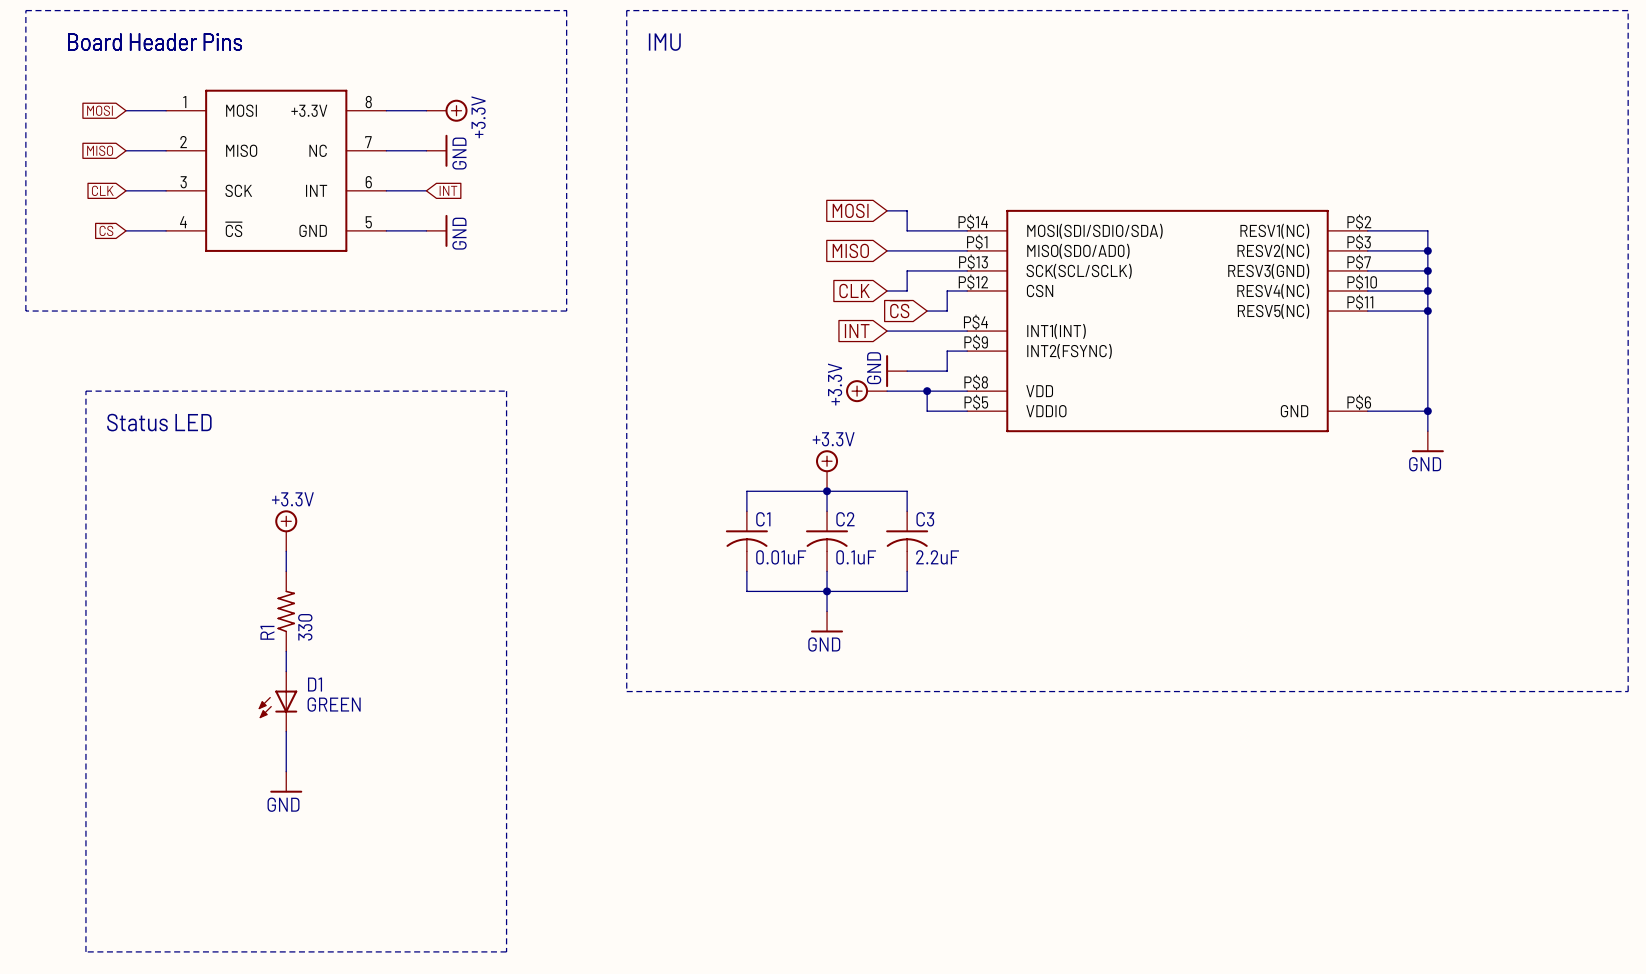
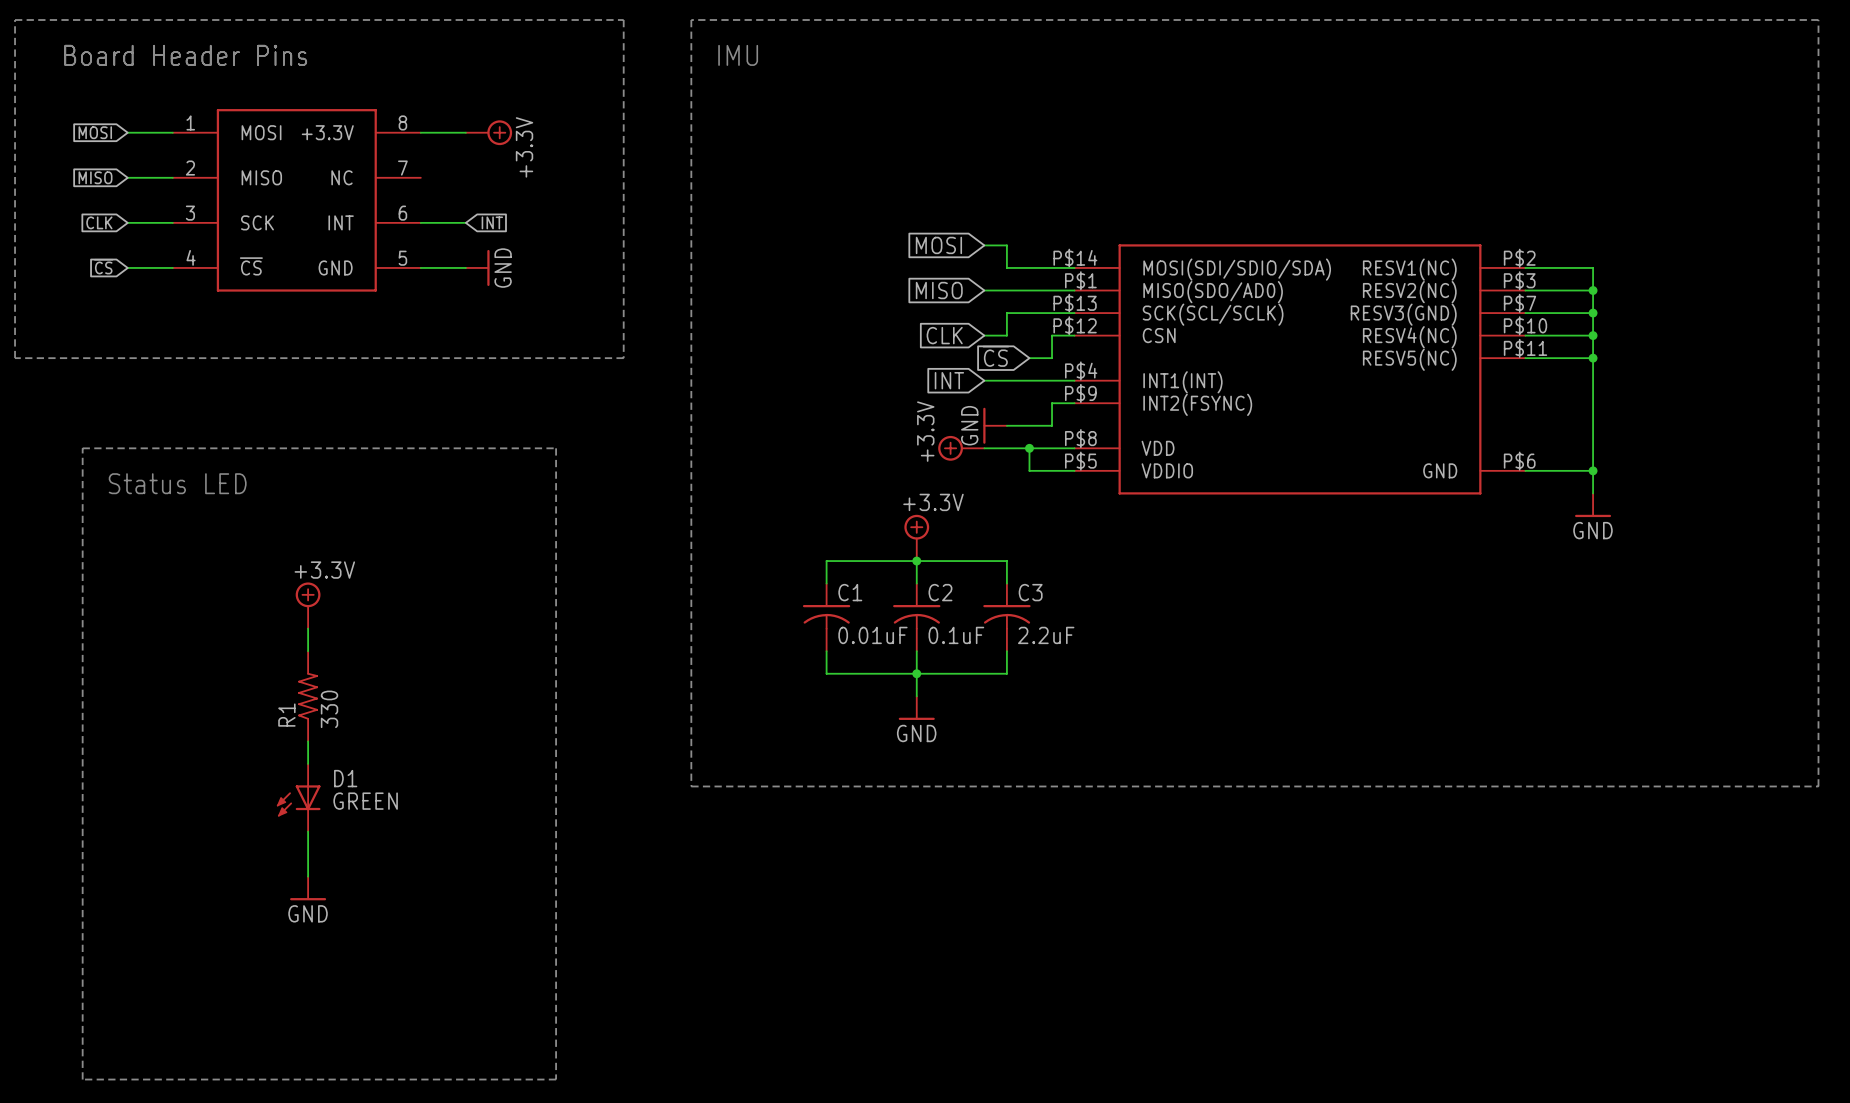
wire: (386, 150) (426, 150) -> none
power symbol: GND (436, 150) -> none

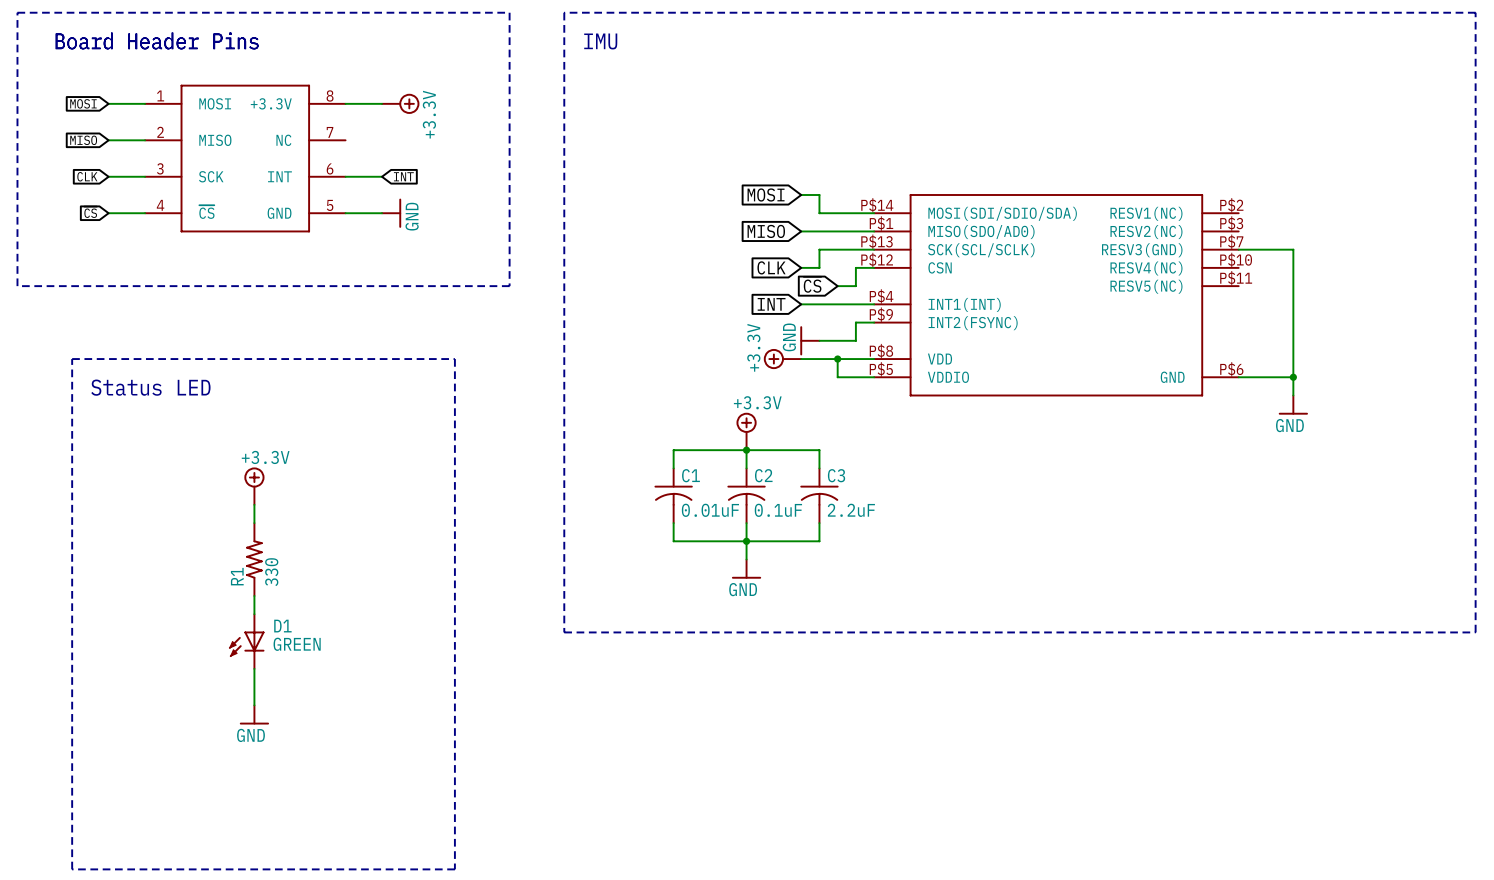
wire: (1525, 267) (1593, 267) (1593, 313) -> none
wire: (1525, 290) (1593, 290) -> none
junction: (1593, 290) -> none
junction: (1593, 313) -> none
wire: (1525, 335) (1593, 335) -> none
junction: (1593, 335) -> none
wire: (1525, 358) (1593, 358) -> none
junction: (1593, 358) -> none

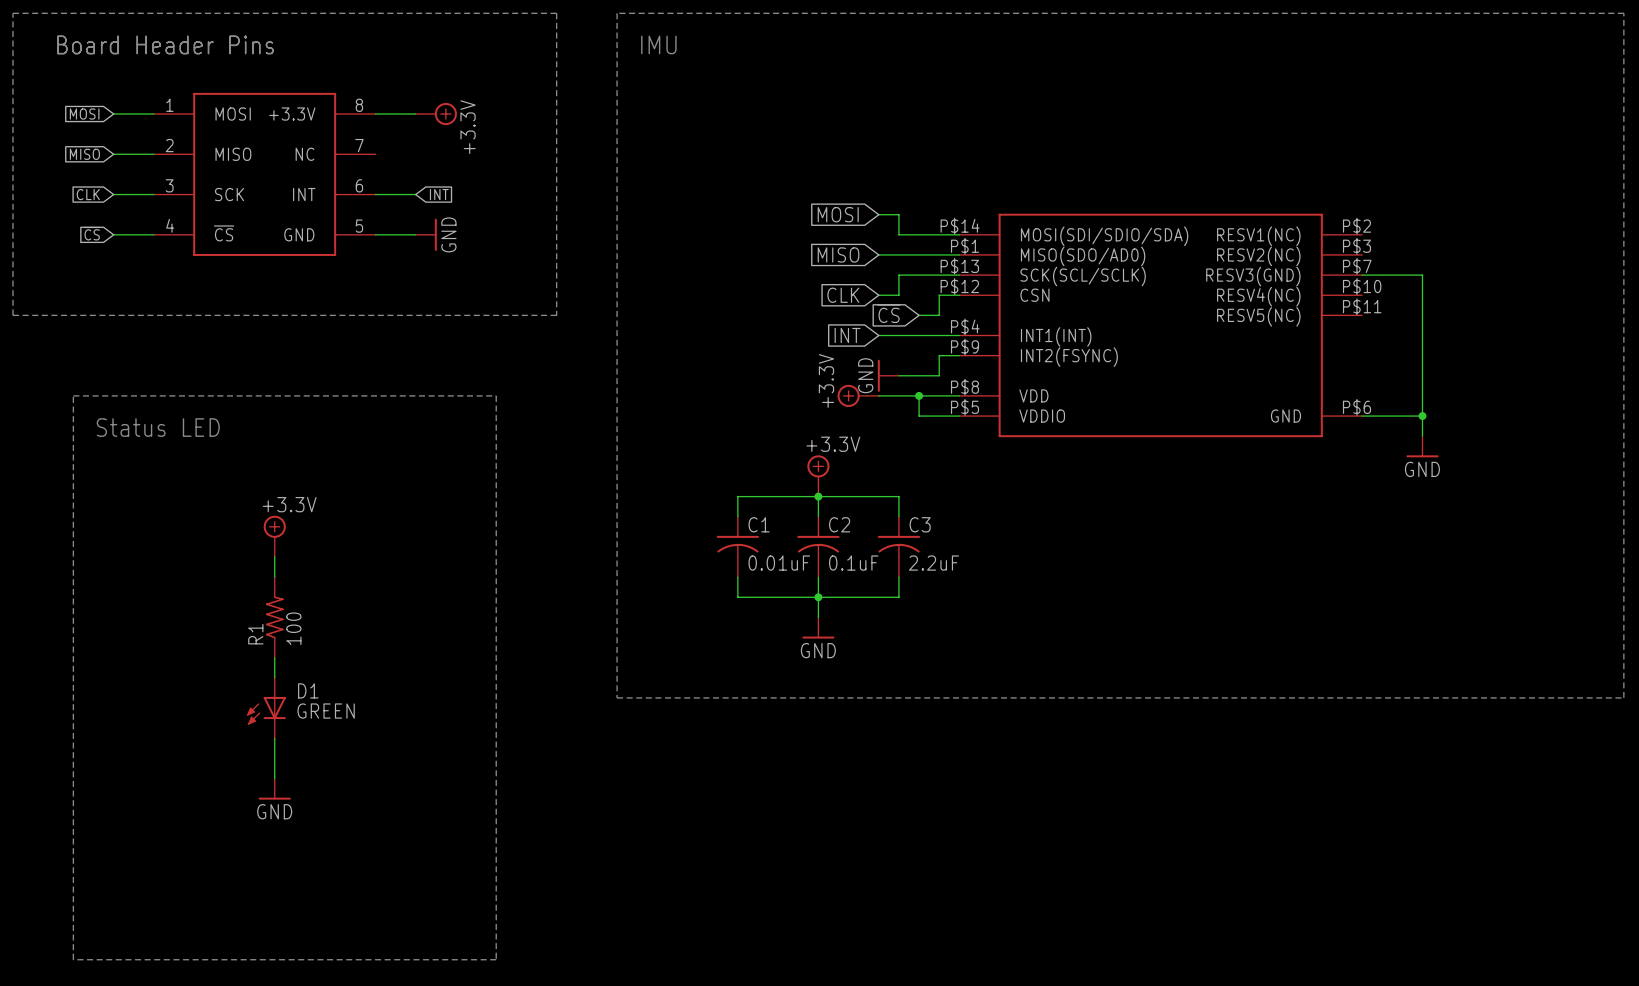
R1 value: 330 (271, 572) -> 100 (293, 628)

